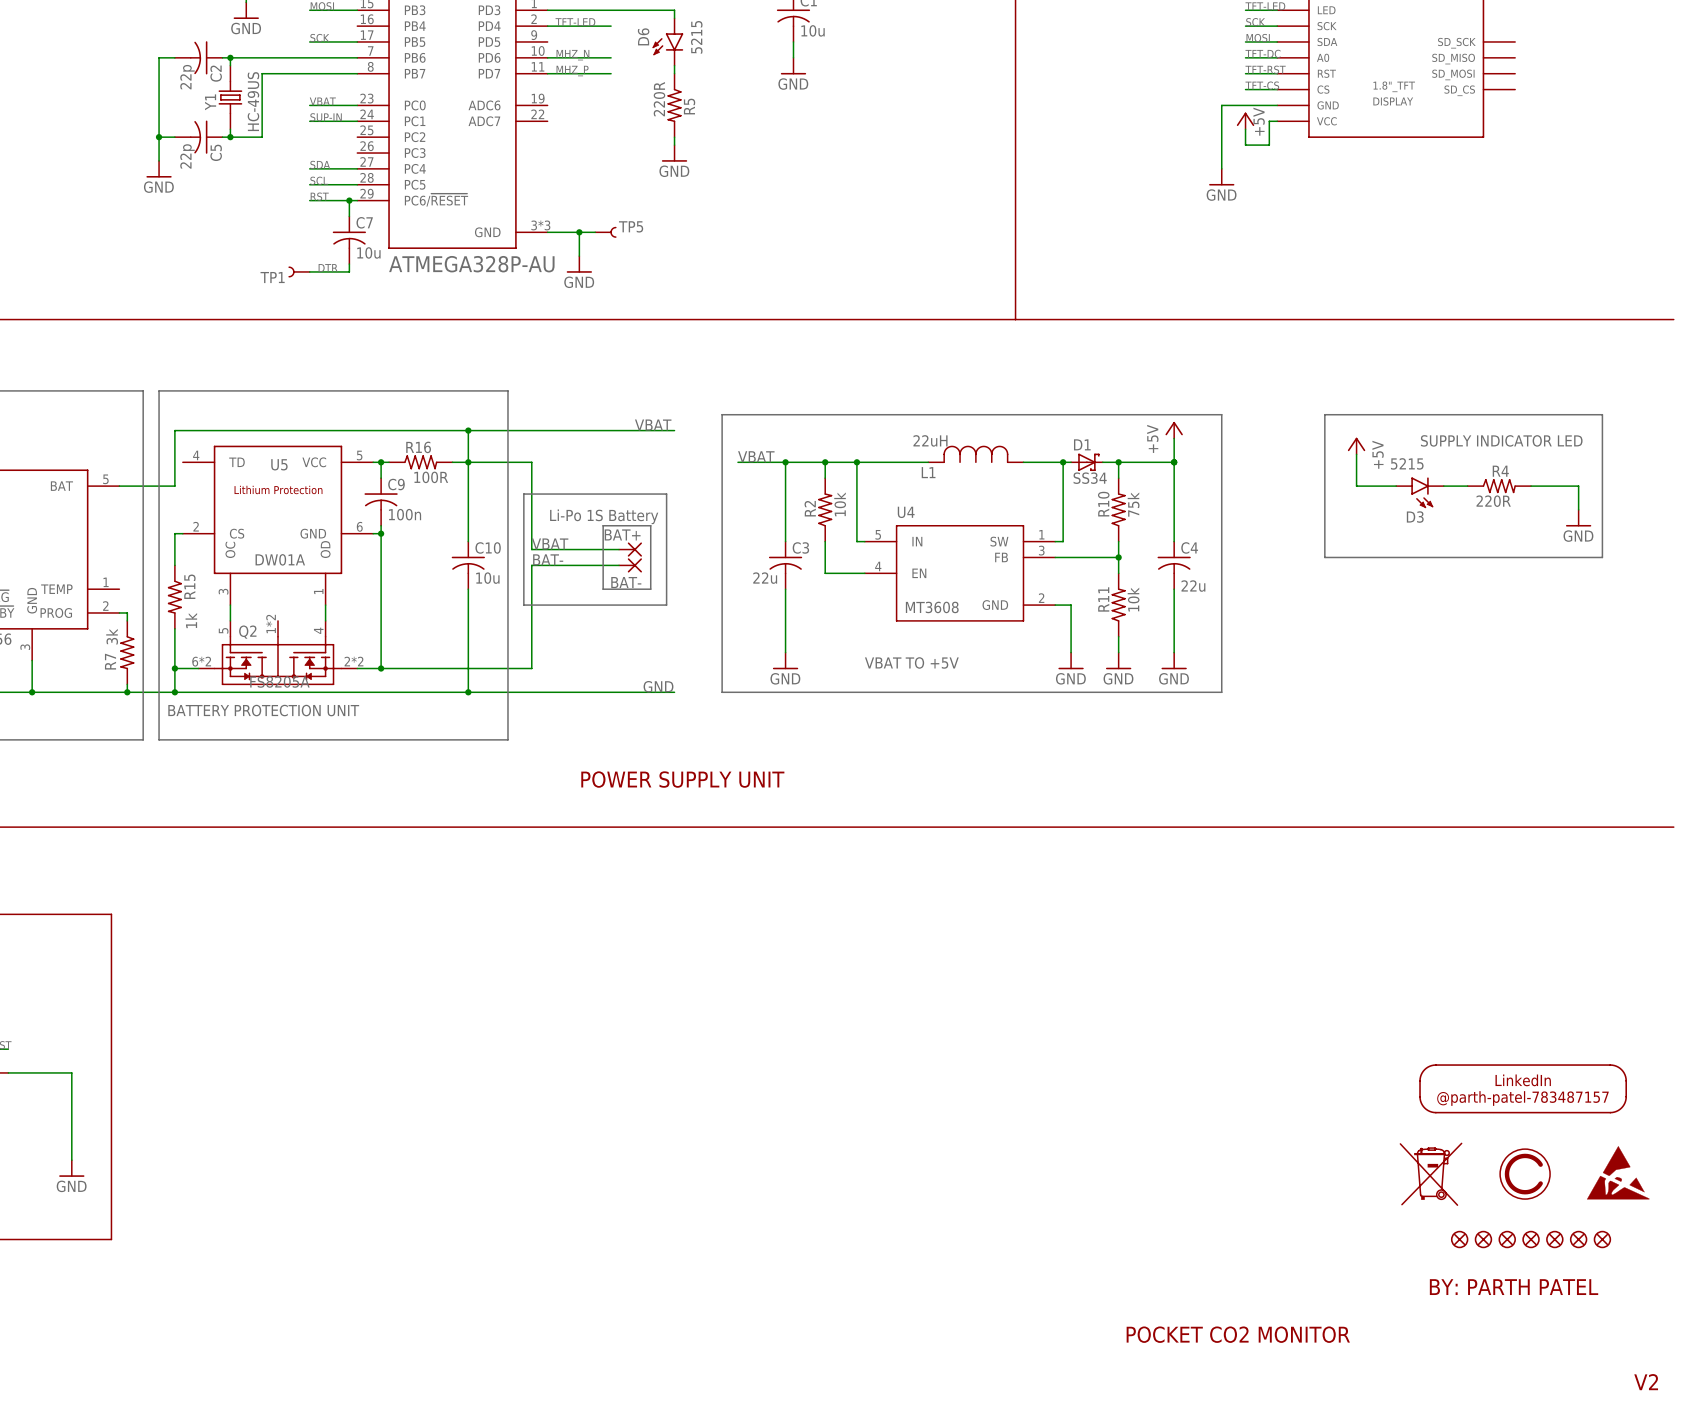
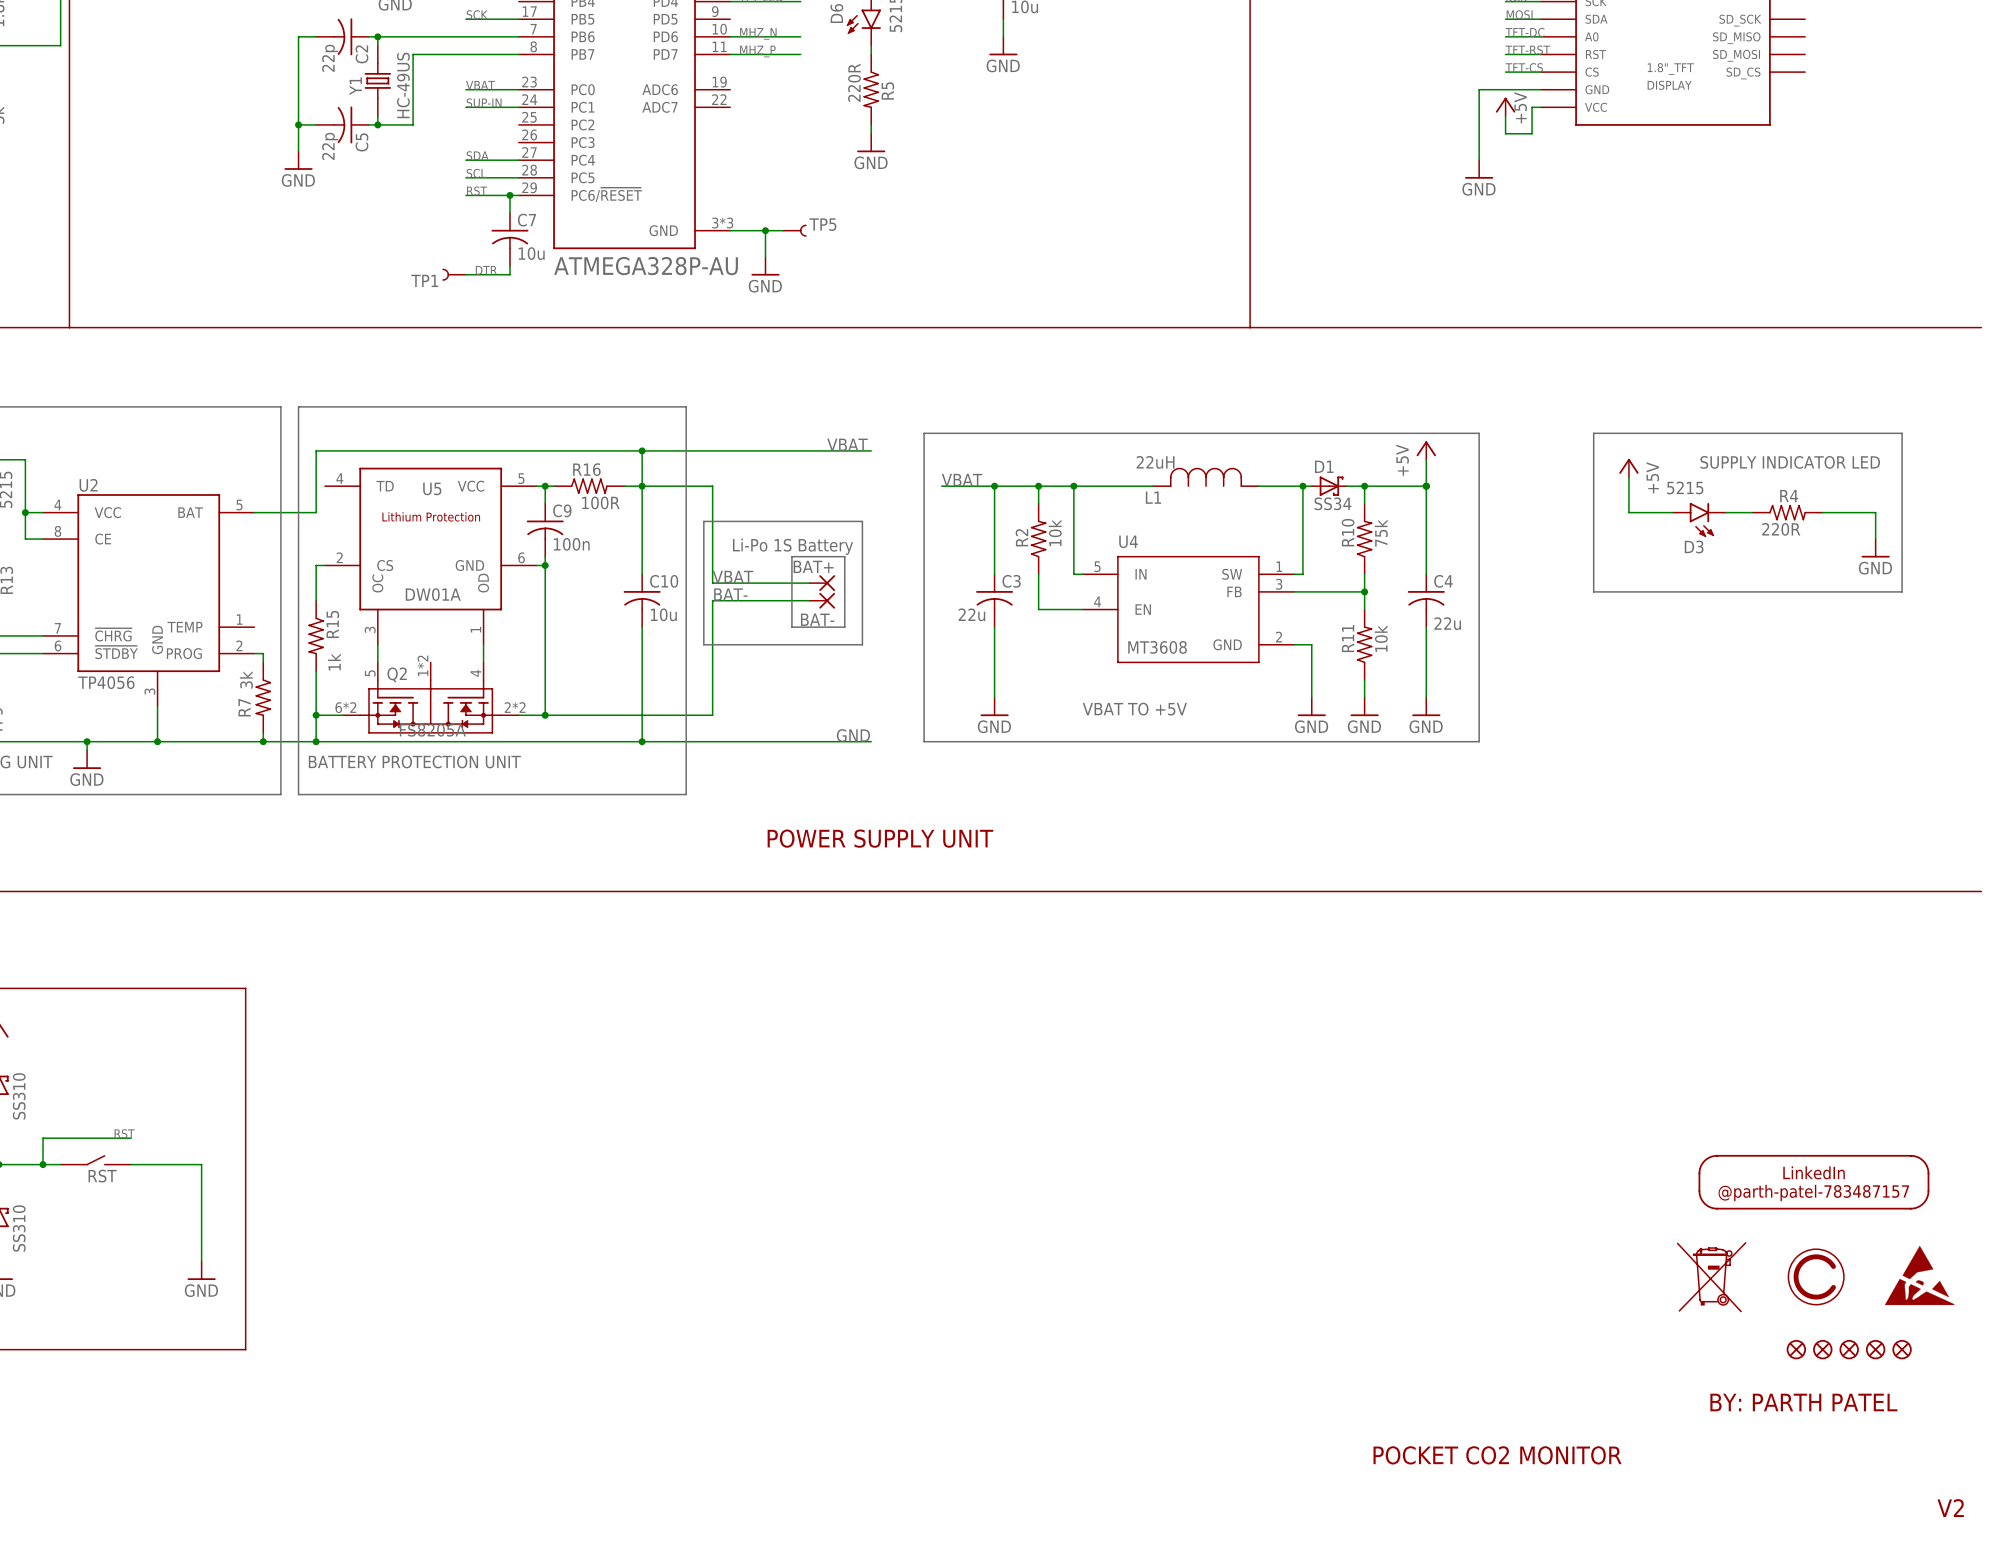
part: (1459, 1239) -> none
part: (1483, 1239) -> none

